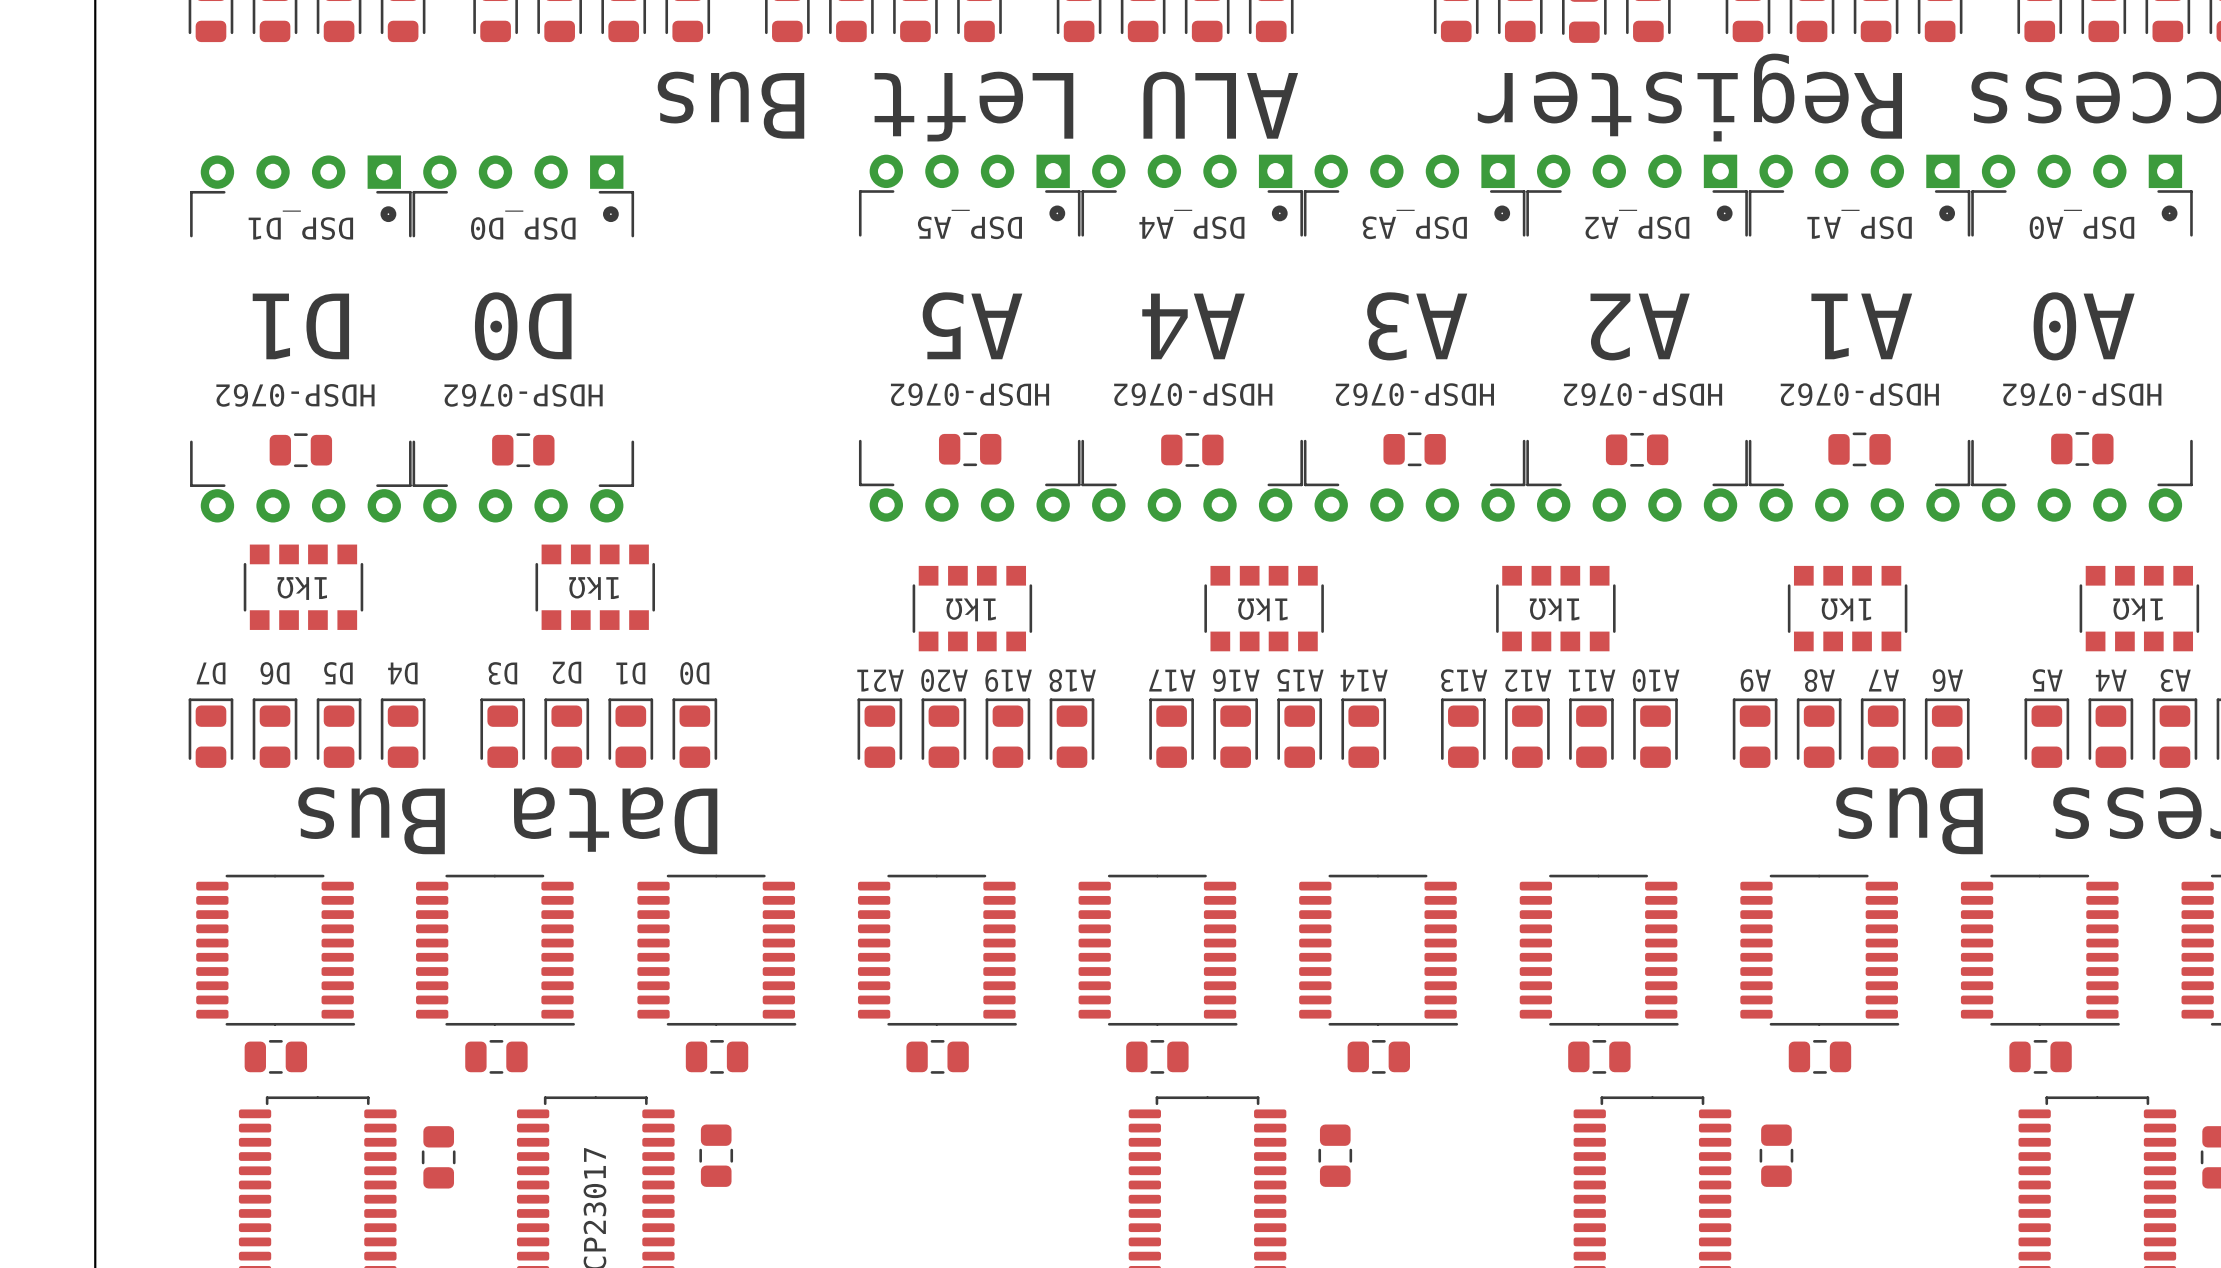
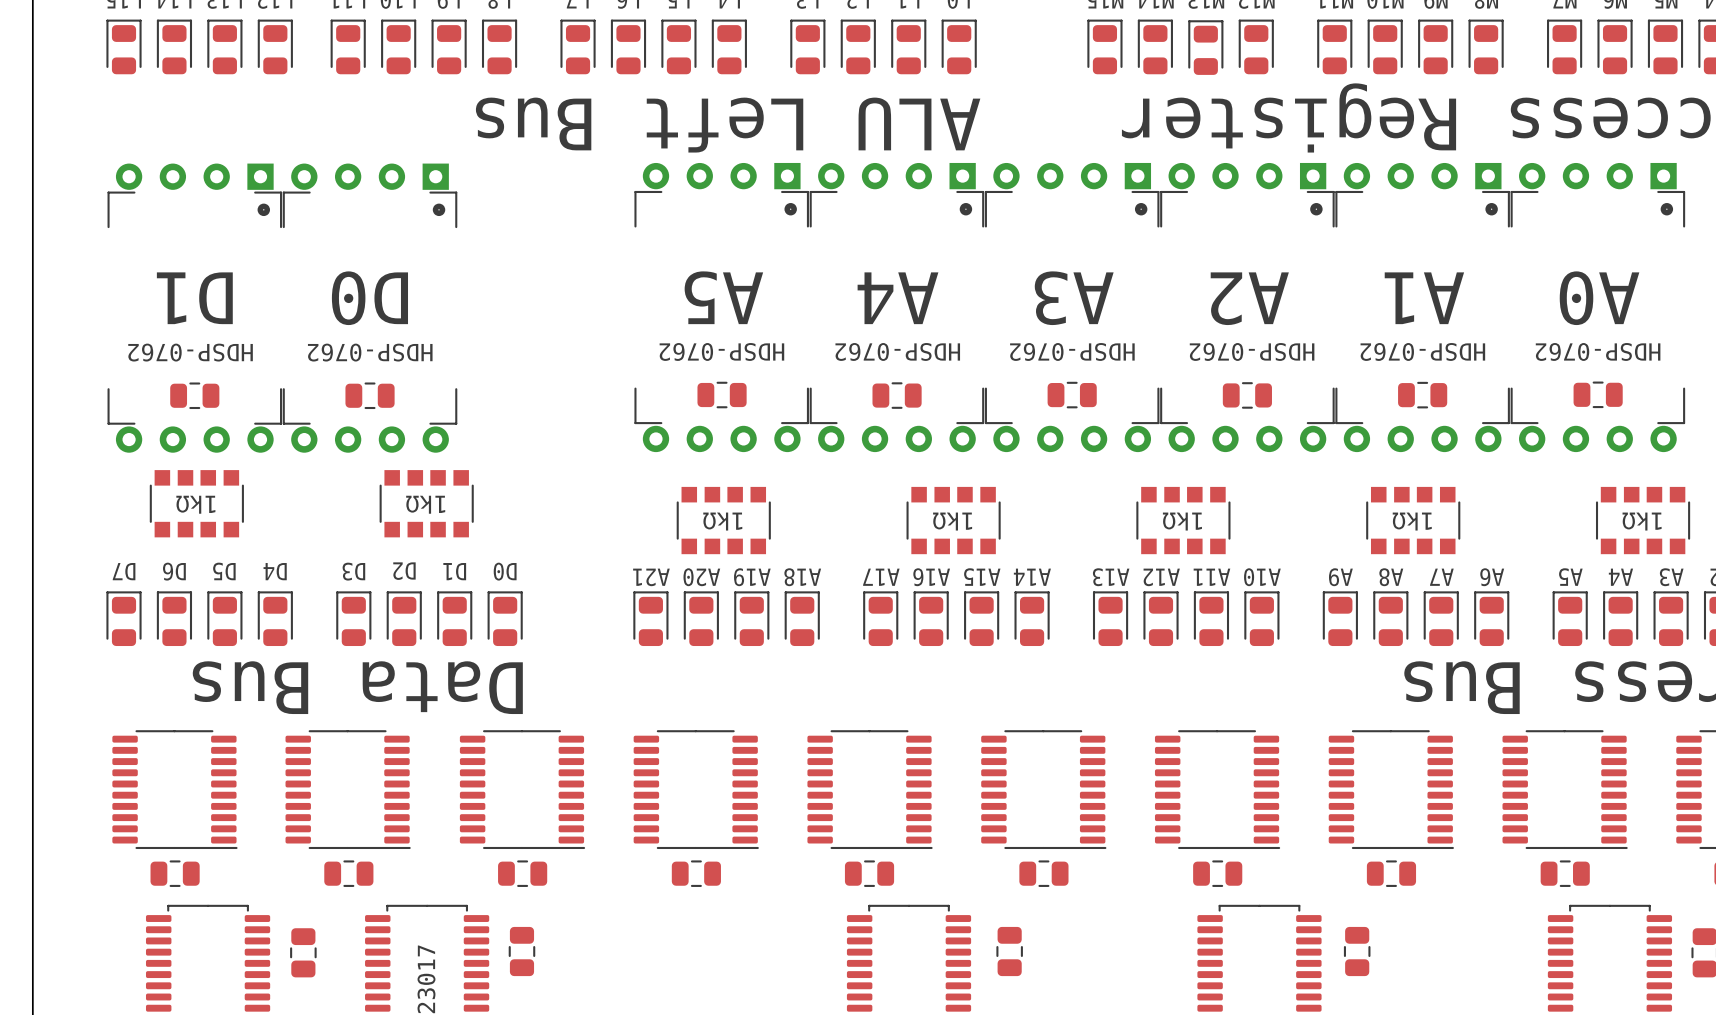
DSP_A5 name: DSP_A5 (969, 224) -> none
DSP_A4 name: DSP_A4 (1191, 224) -> none
DSP_A3 name: DSP_A3 (1414, 224) -> none
DSP_A2 name: DSP_A2 (1637, 224) -> none
DSP_A1 name: DSP_A1 (1859, 224) -> none
DSP_A0 name: DSP_A0 (2081, 224) -> none
DSP_D1 name: DSP_D1 (300, 225) -> none
DSP_D0 name: DSP_D0 (523, 225) -> none

